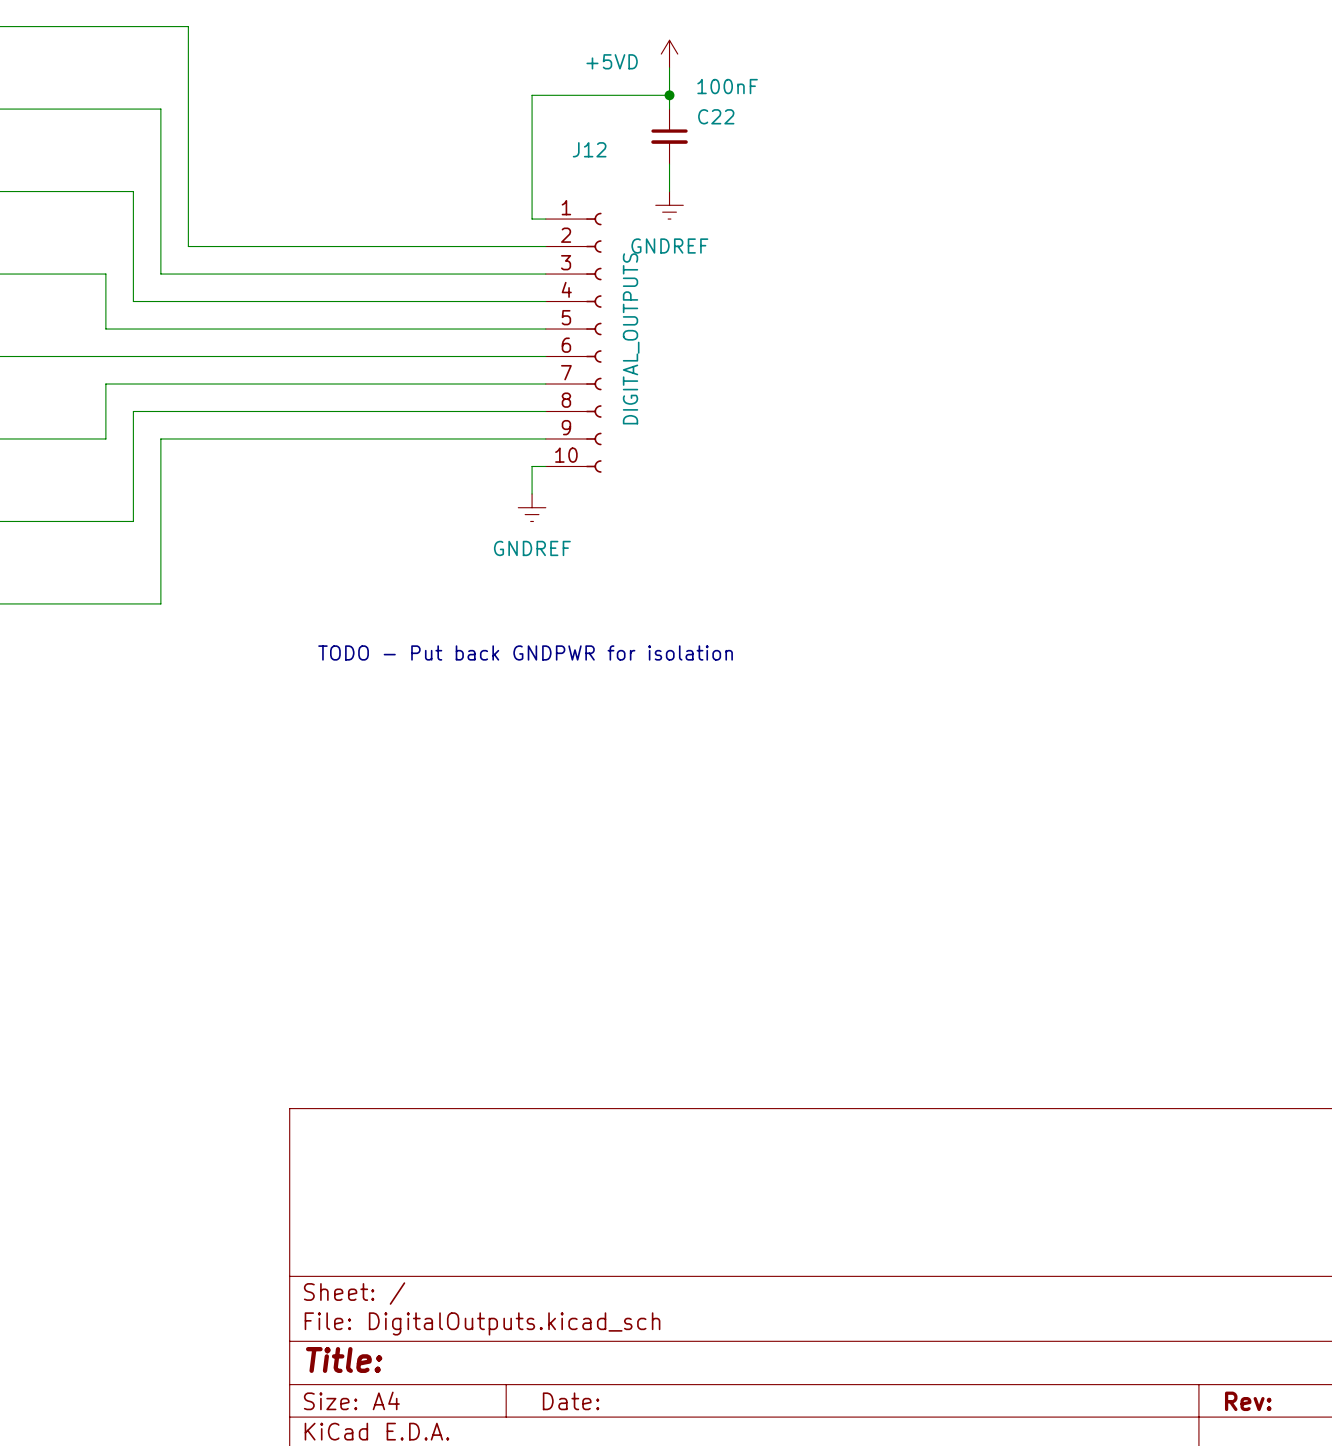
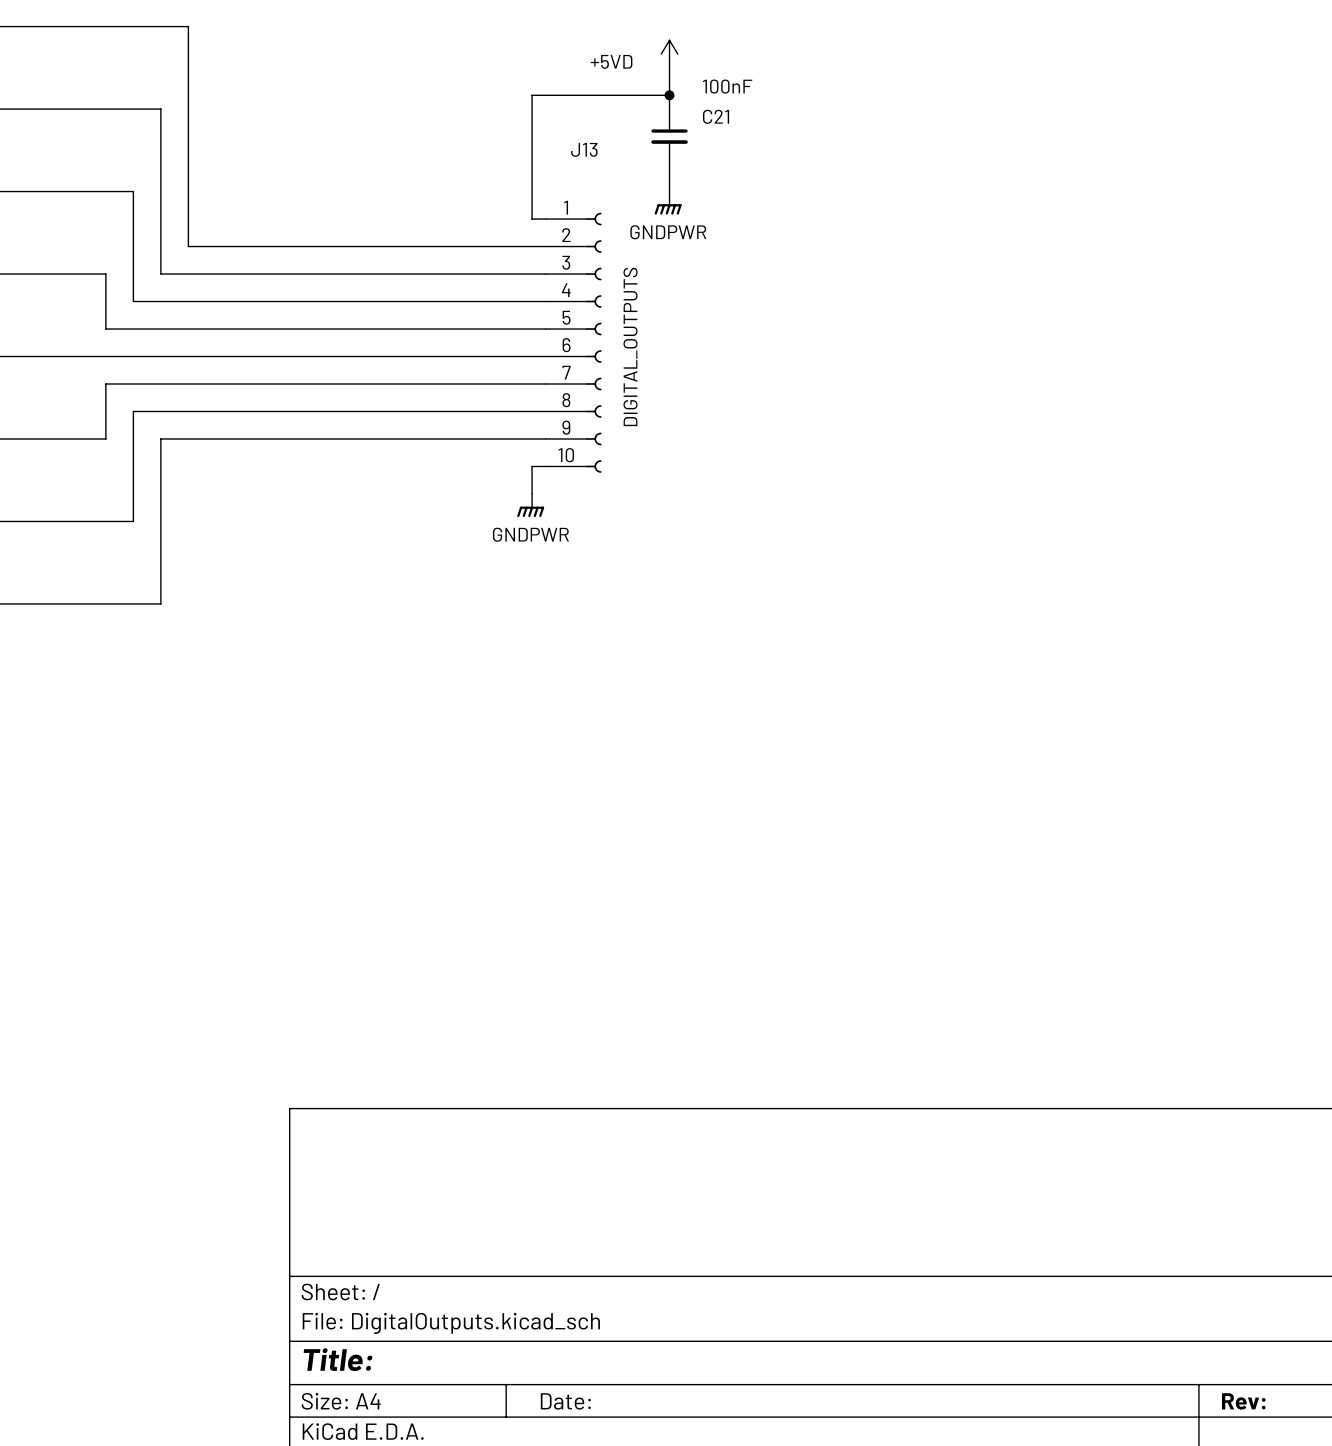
C22 name: C22 (716, 116) -> C21 (716, 116)
J12 name: J12 (589, 149) -> J13 (584, 149)
power symbol: GNDREF (669, 205) -> GNDPWR (668, 203)
power symbol: GNDREF (532, 507) -> GNDPWR (530, 505)
text: TODO - Put back GNDPWR for isolation (525, 652) -> none

